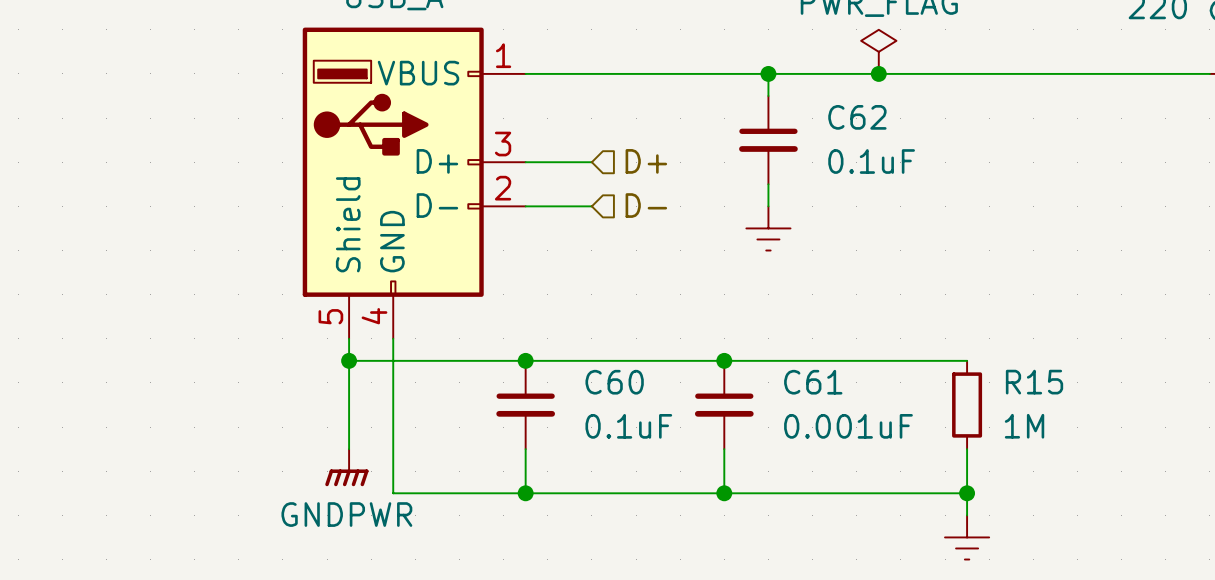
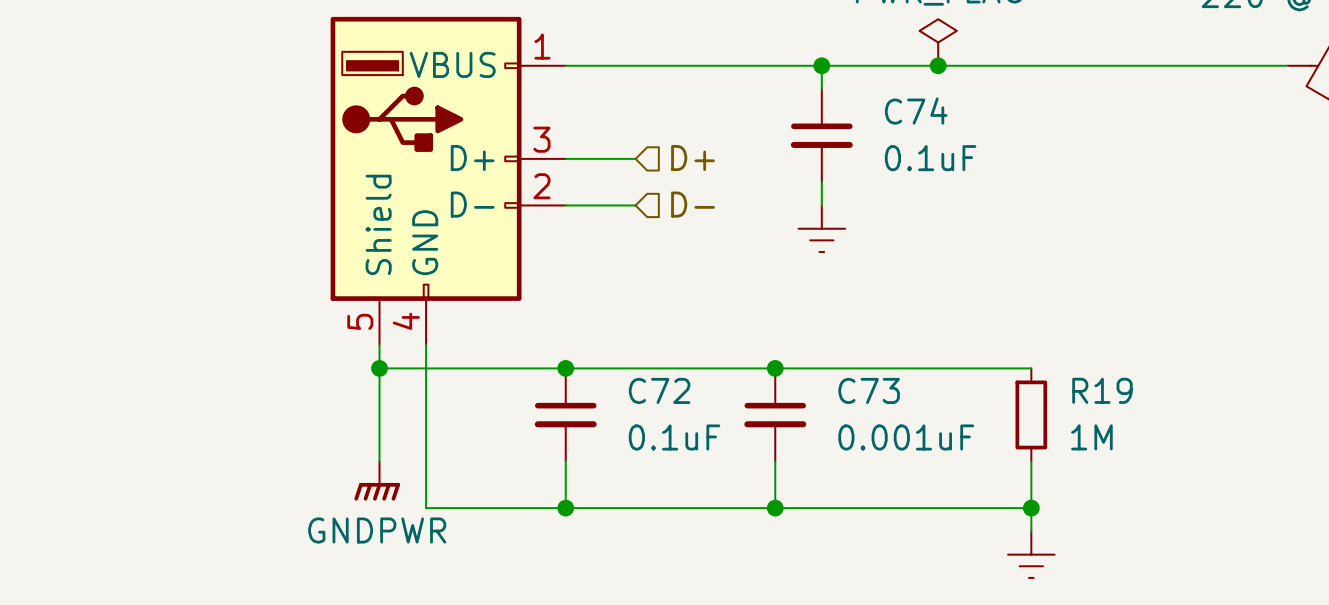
C62 name: C62 (857, 117) -> C74 (916, 111)
C60 name: C60 (614, 382) -> C72 (659, 390)
C61 name: C61 (813, 382) -> C73 (869, 390)
R15 name: R15 (1034, 382) -> R19 (1102, 390)

